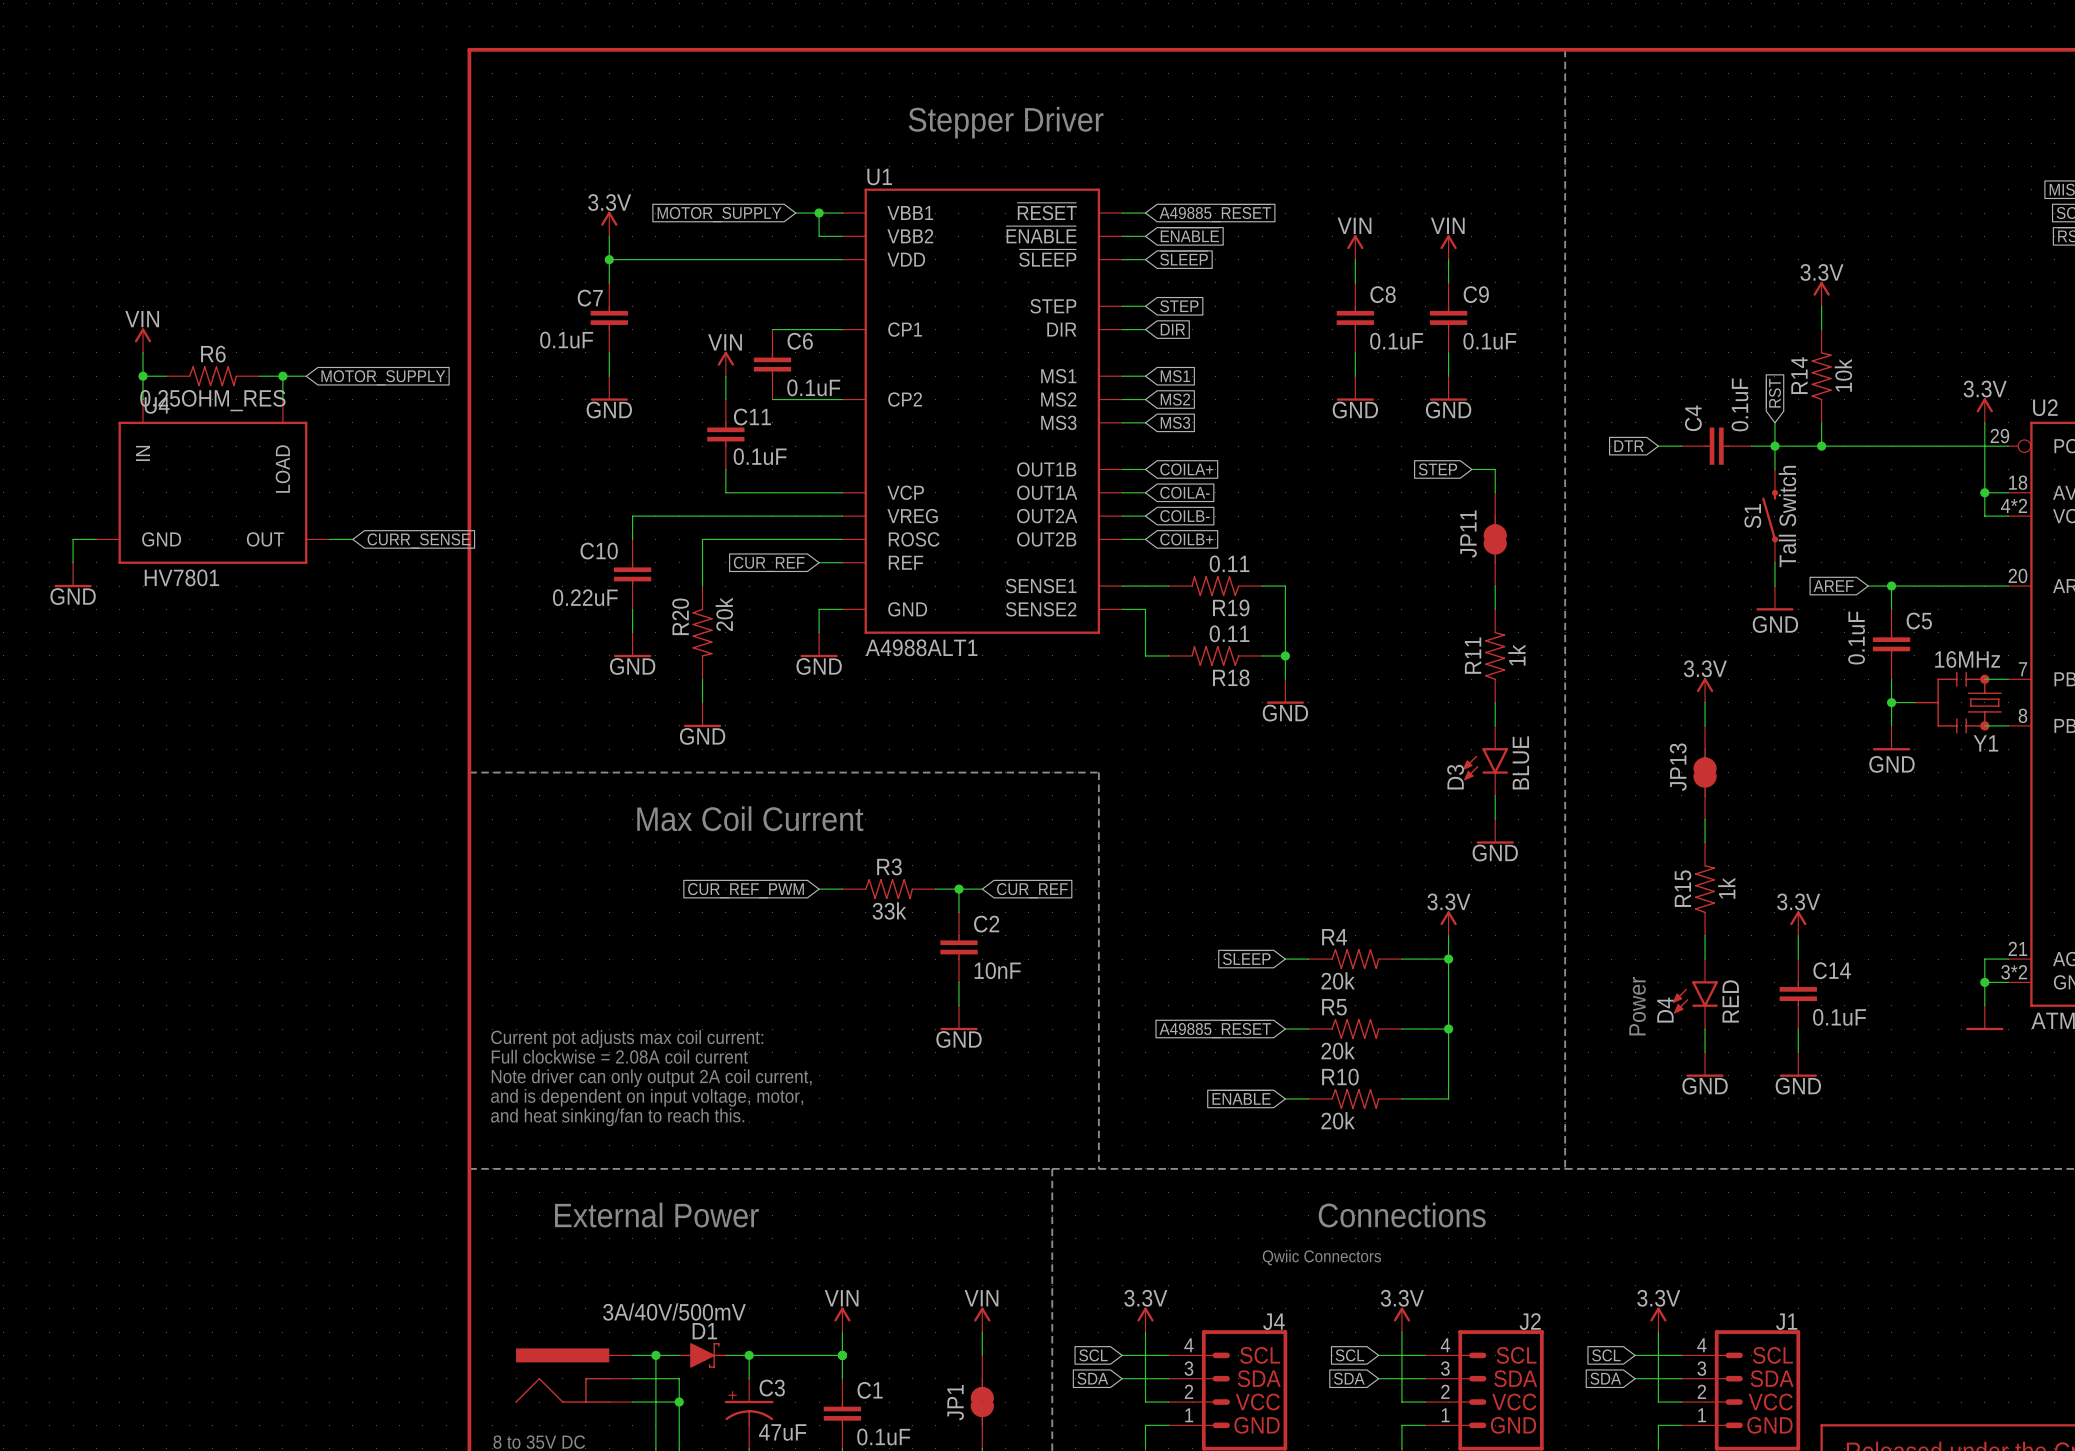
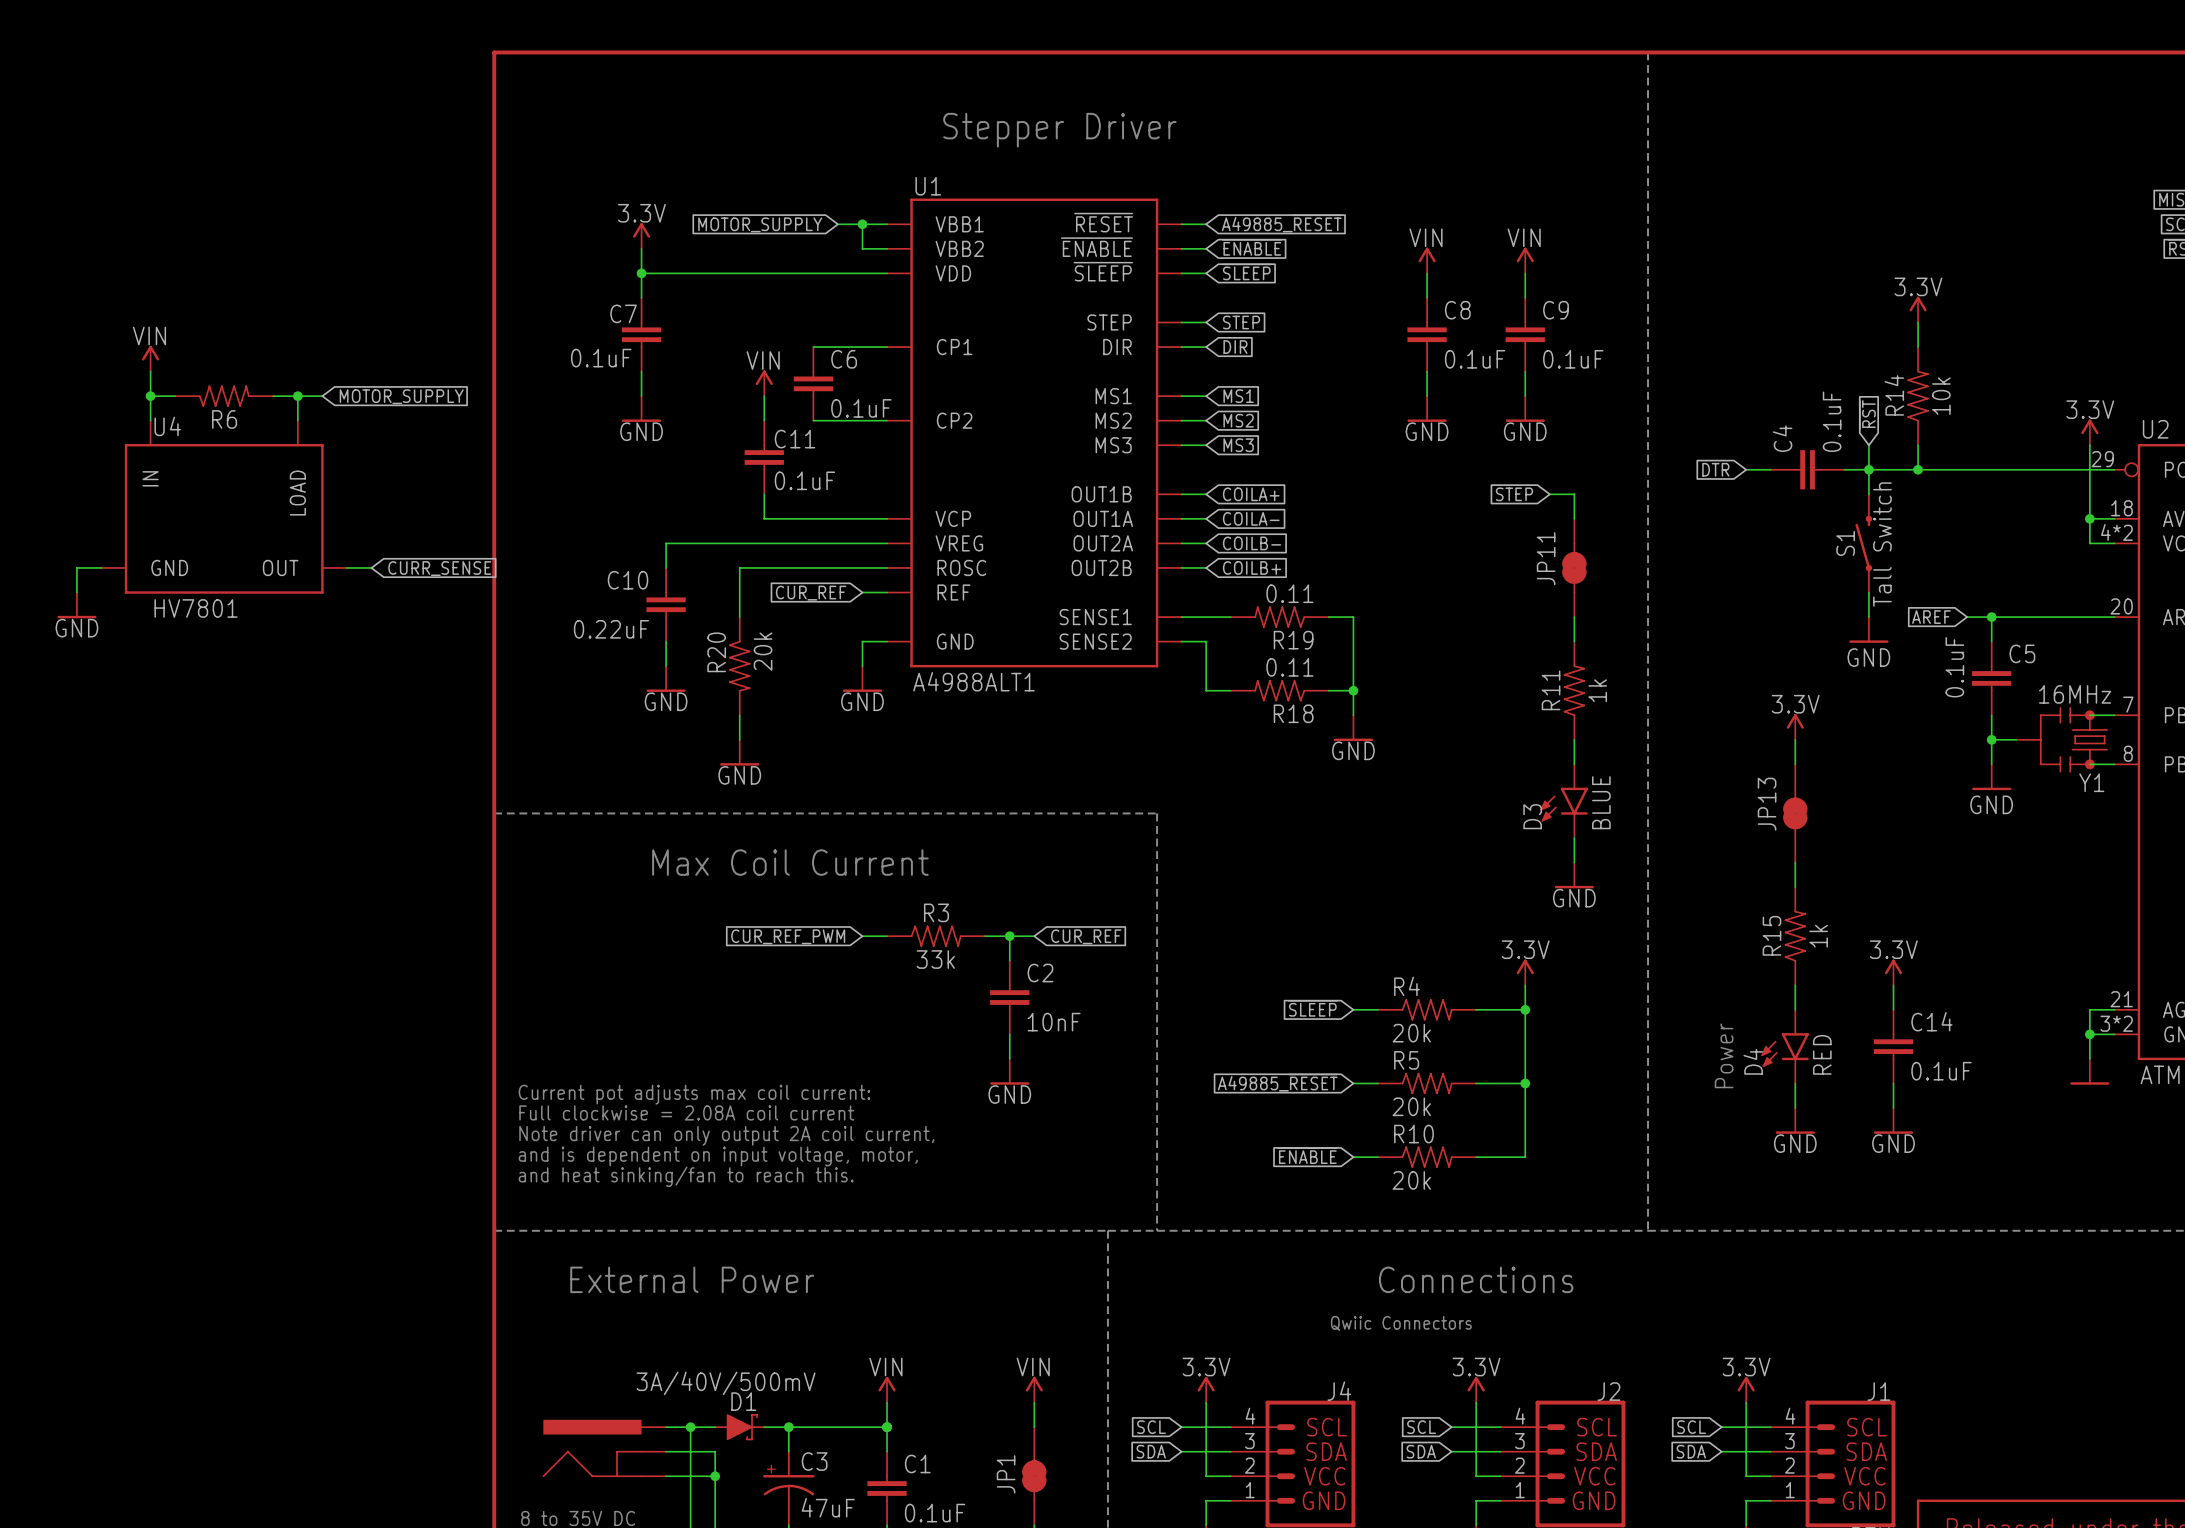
R6 flip: as is (212, 376) -> up-down (224, 396)
R6 value: 0.25OHM_RES (212, 400) -> none

